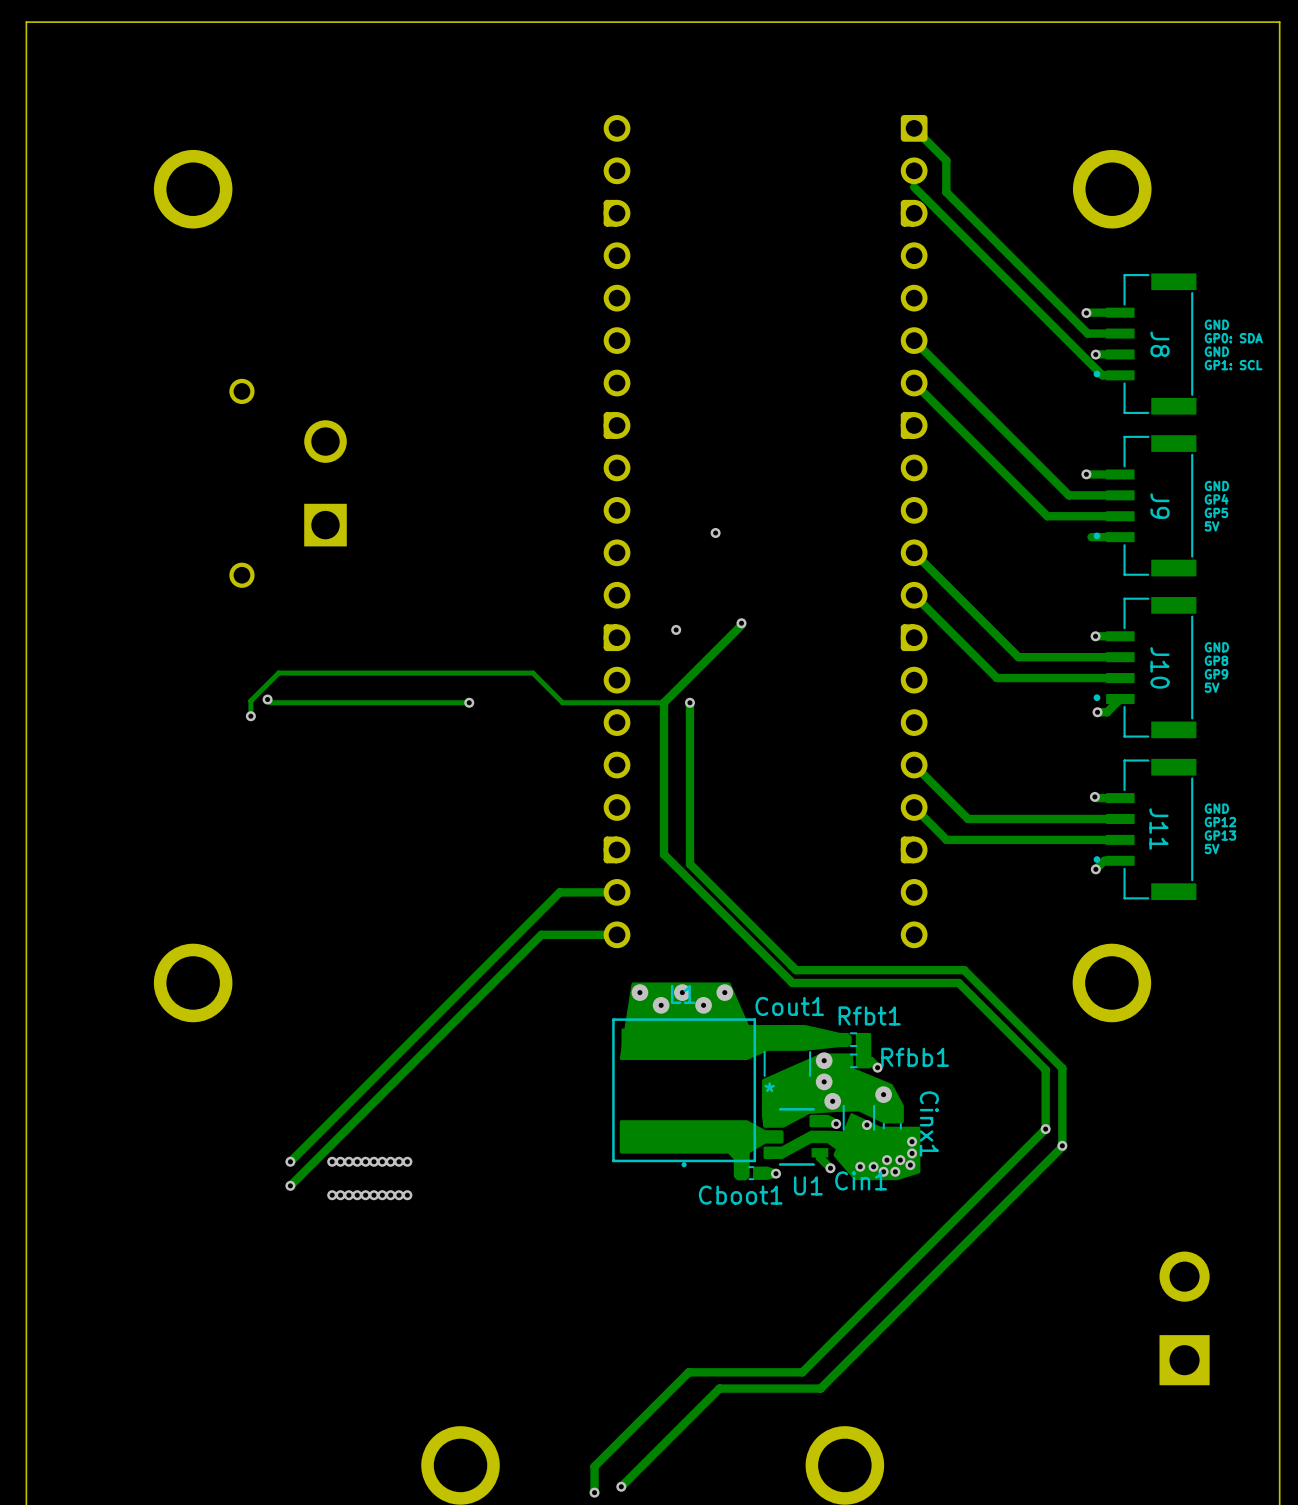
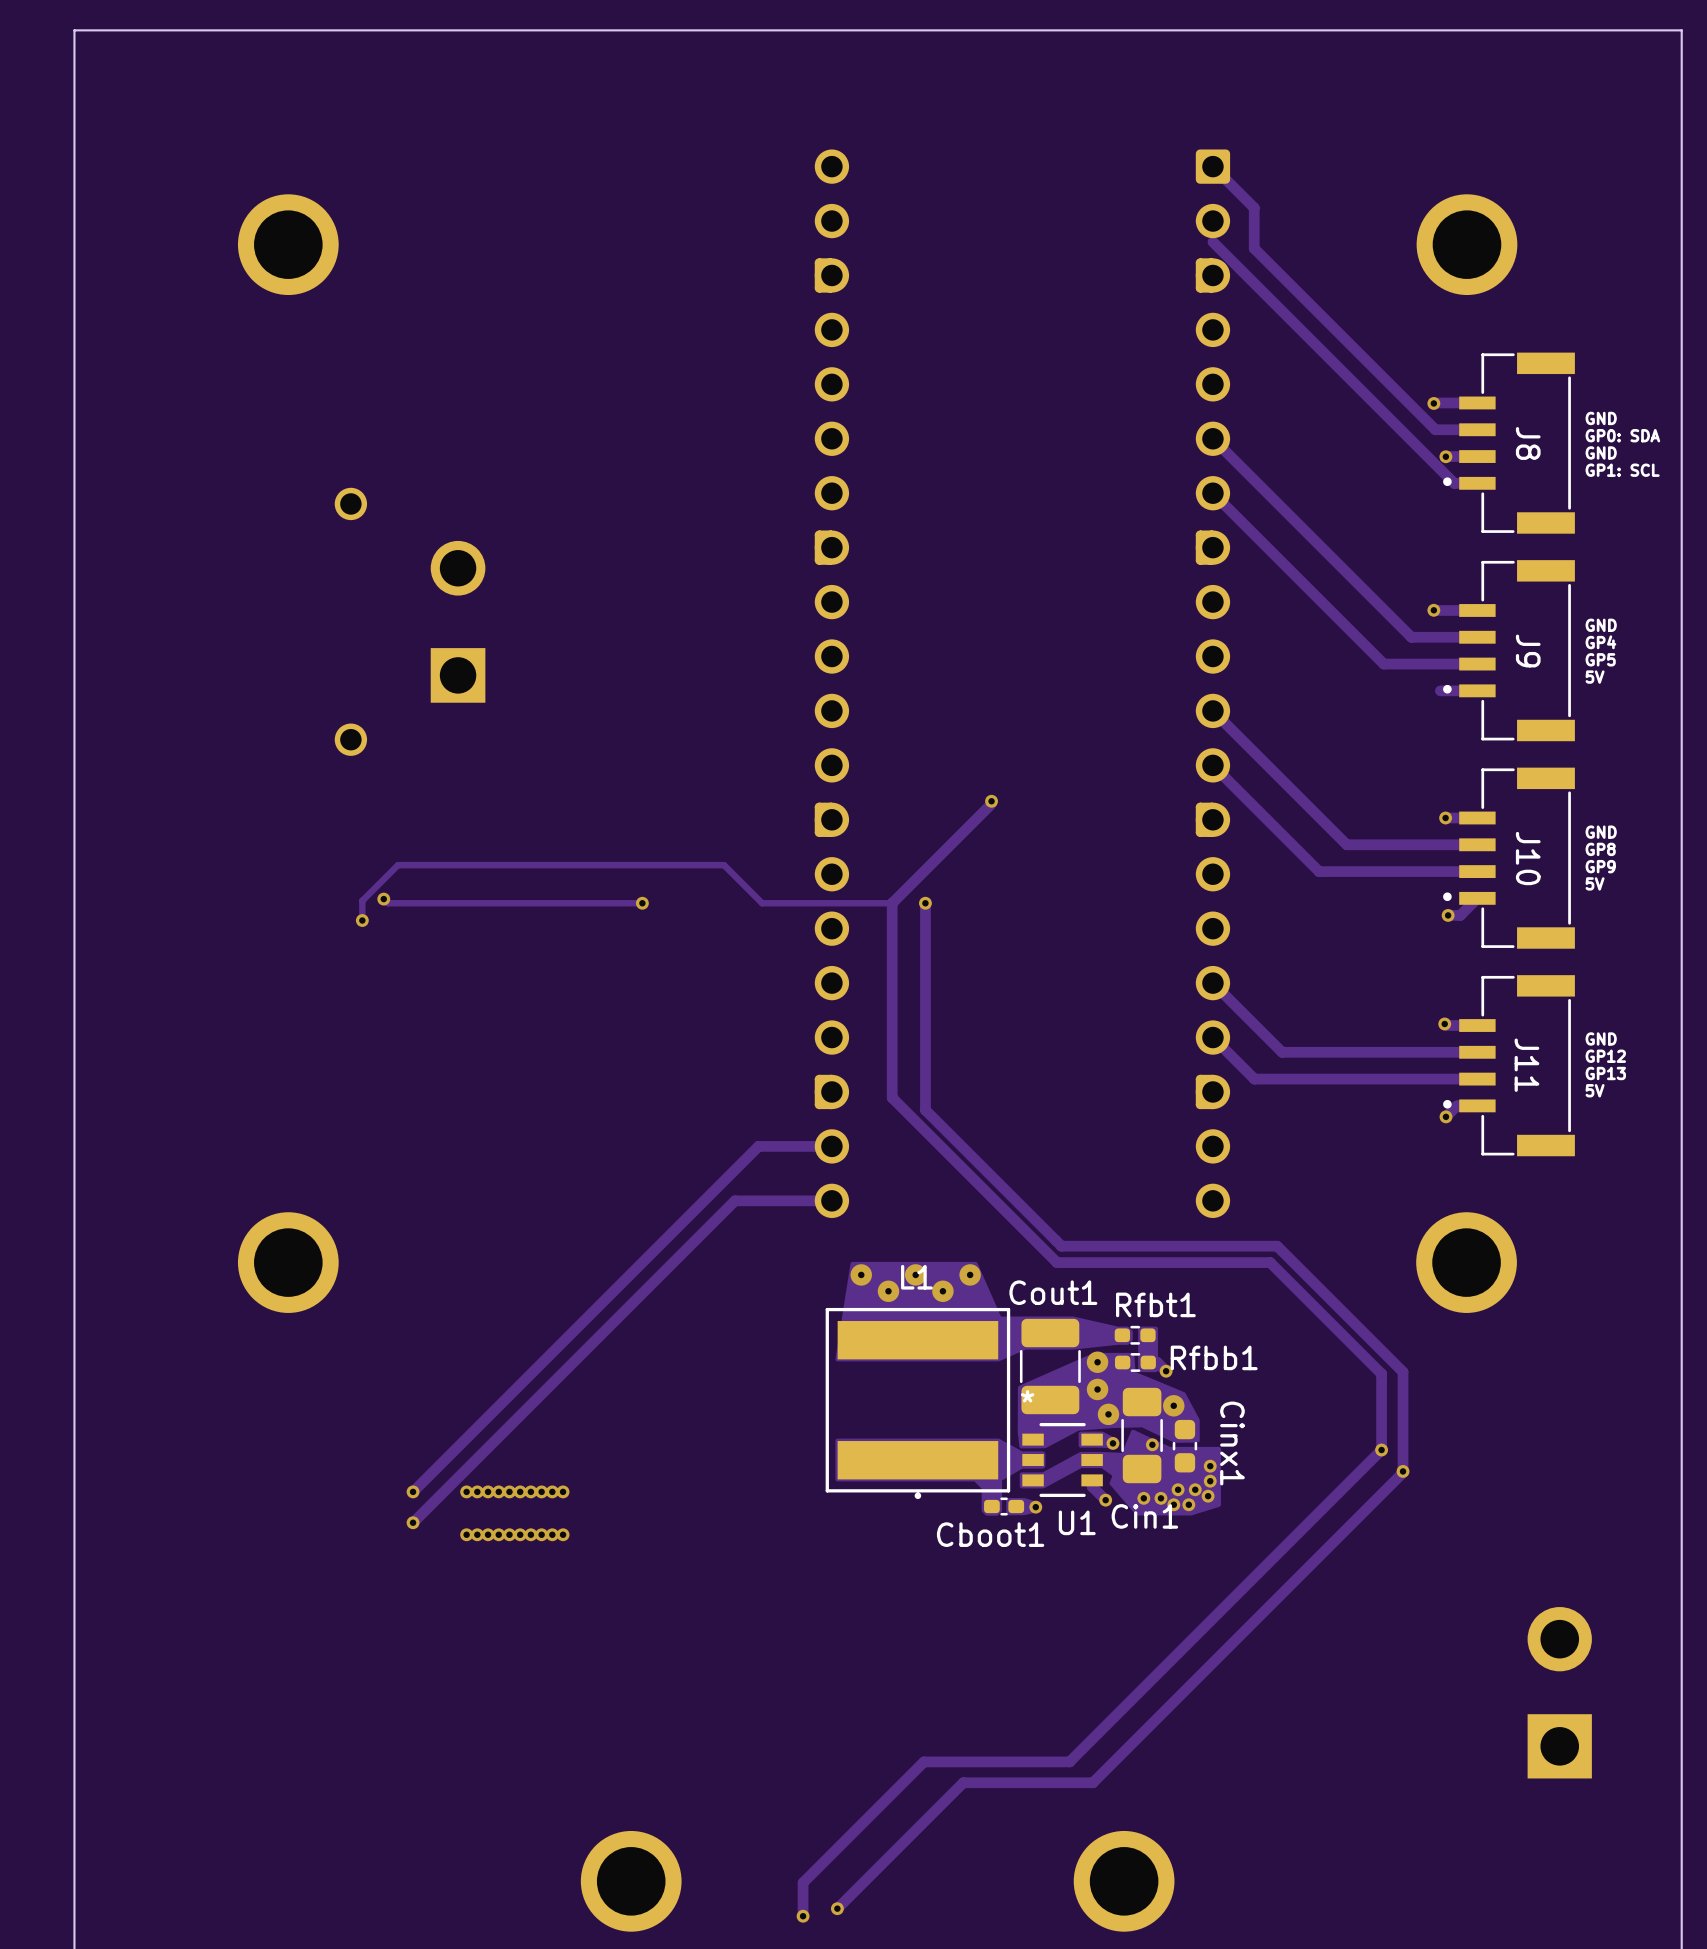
via: (715, 532) -> none
via: (676, 629) -> none

